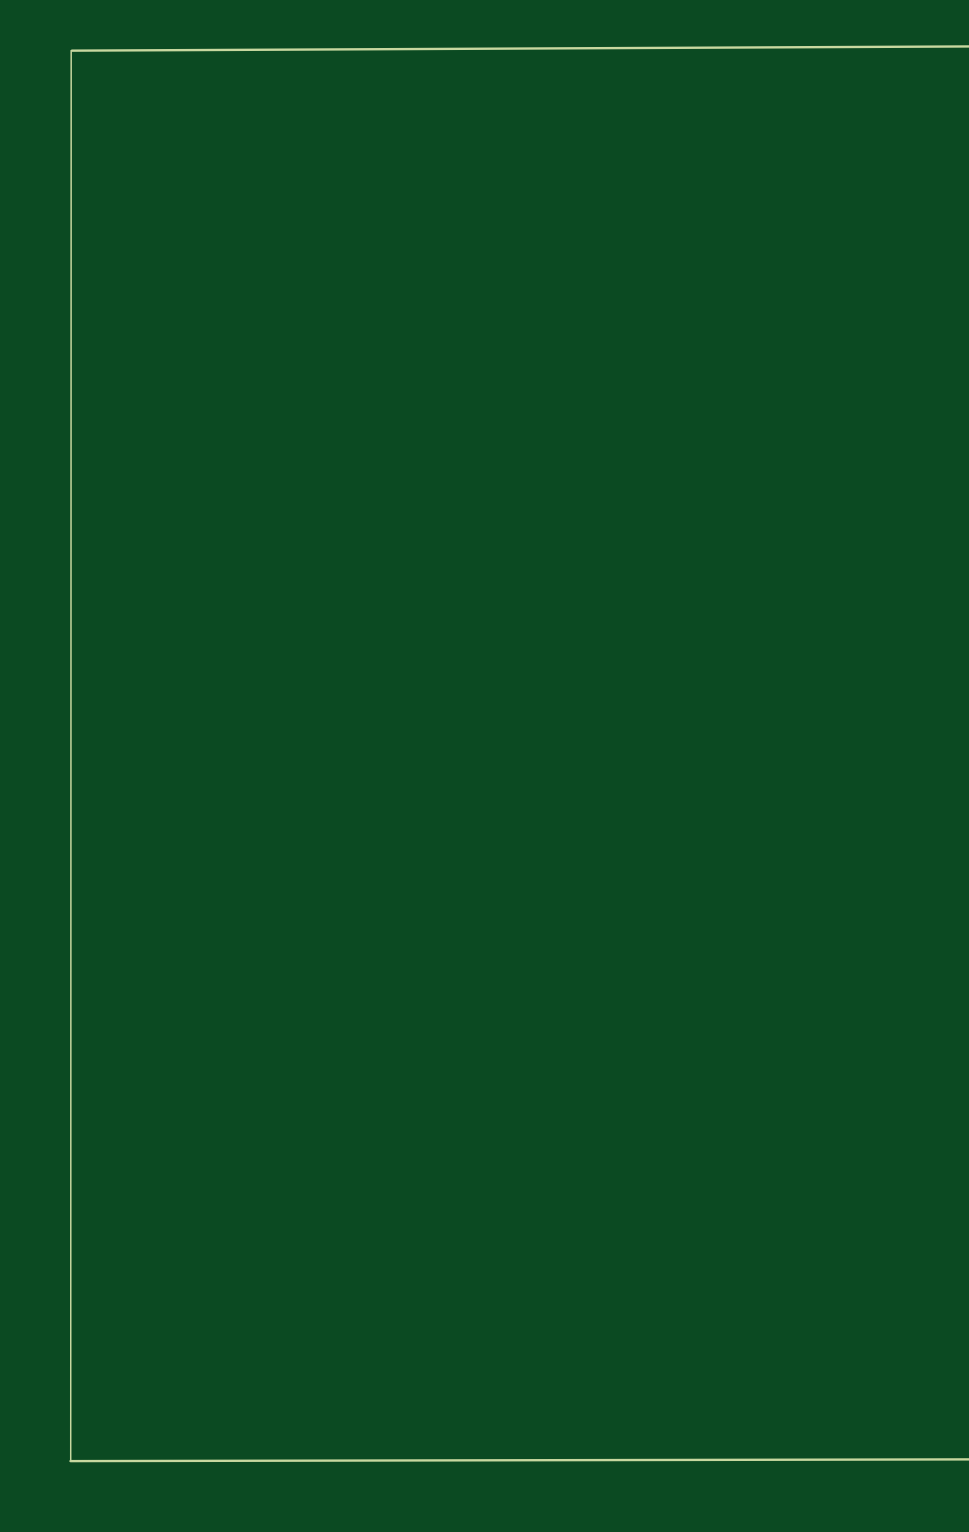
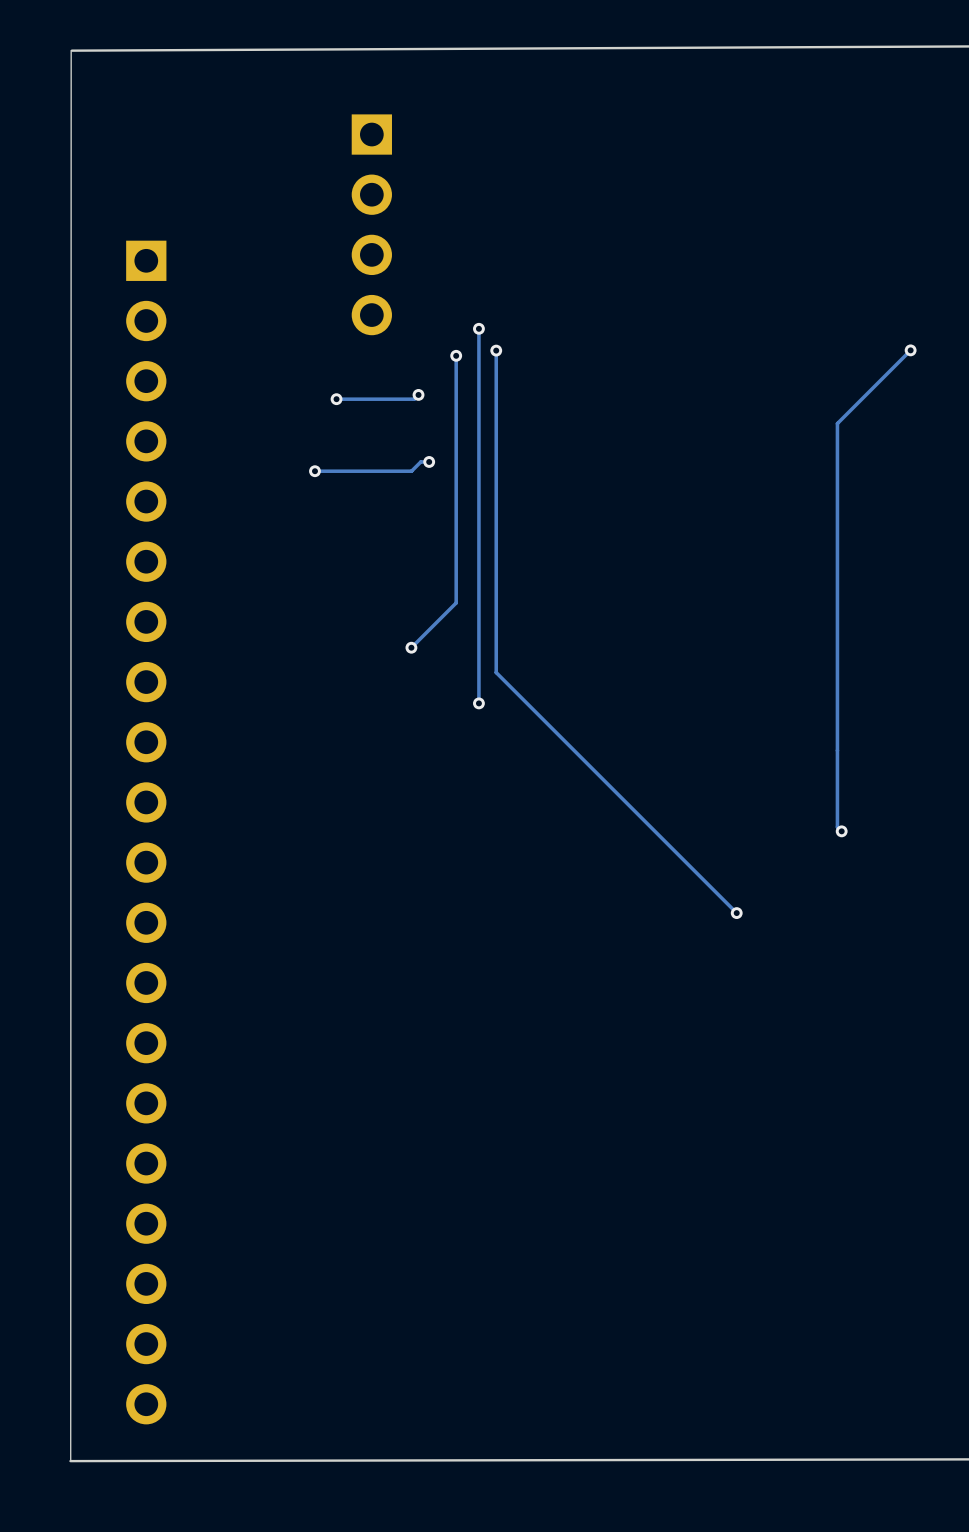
part: none -> (371, 224)
track: none -> (478, 328) (478, 703)
via: none -> (478, 328)
track: none -> (496, 350) (496, 672) (736, 913)
via: none -> (496, 350)
track: none -> (910, 350) (837, 423) (837, 827) (841, 831)
via: none -> (910, 350)
track: none -> (456, 355) (456, 602) (411, 647)
via: none -> (456, 355)
track: none -> (418, 394) (414, 399) (336, 399)
via: none -> (418, 394)
via: none -> (336, 399)
track: none -> (429, 461) (420, 461) (411, 471) (314, 471)
via: none -> (429, 461)
via: none -> (314, 471)
via: none -> (411, 647)
via: none -> (478, 703)
via: none -> (841, 831)
part: none -> (146, 832)
via: none -> (736, 913)

